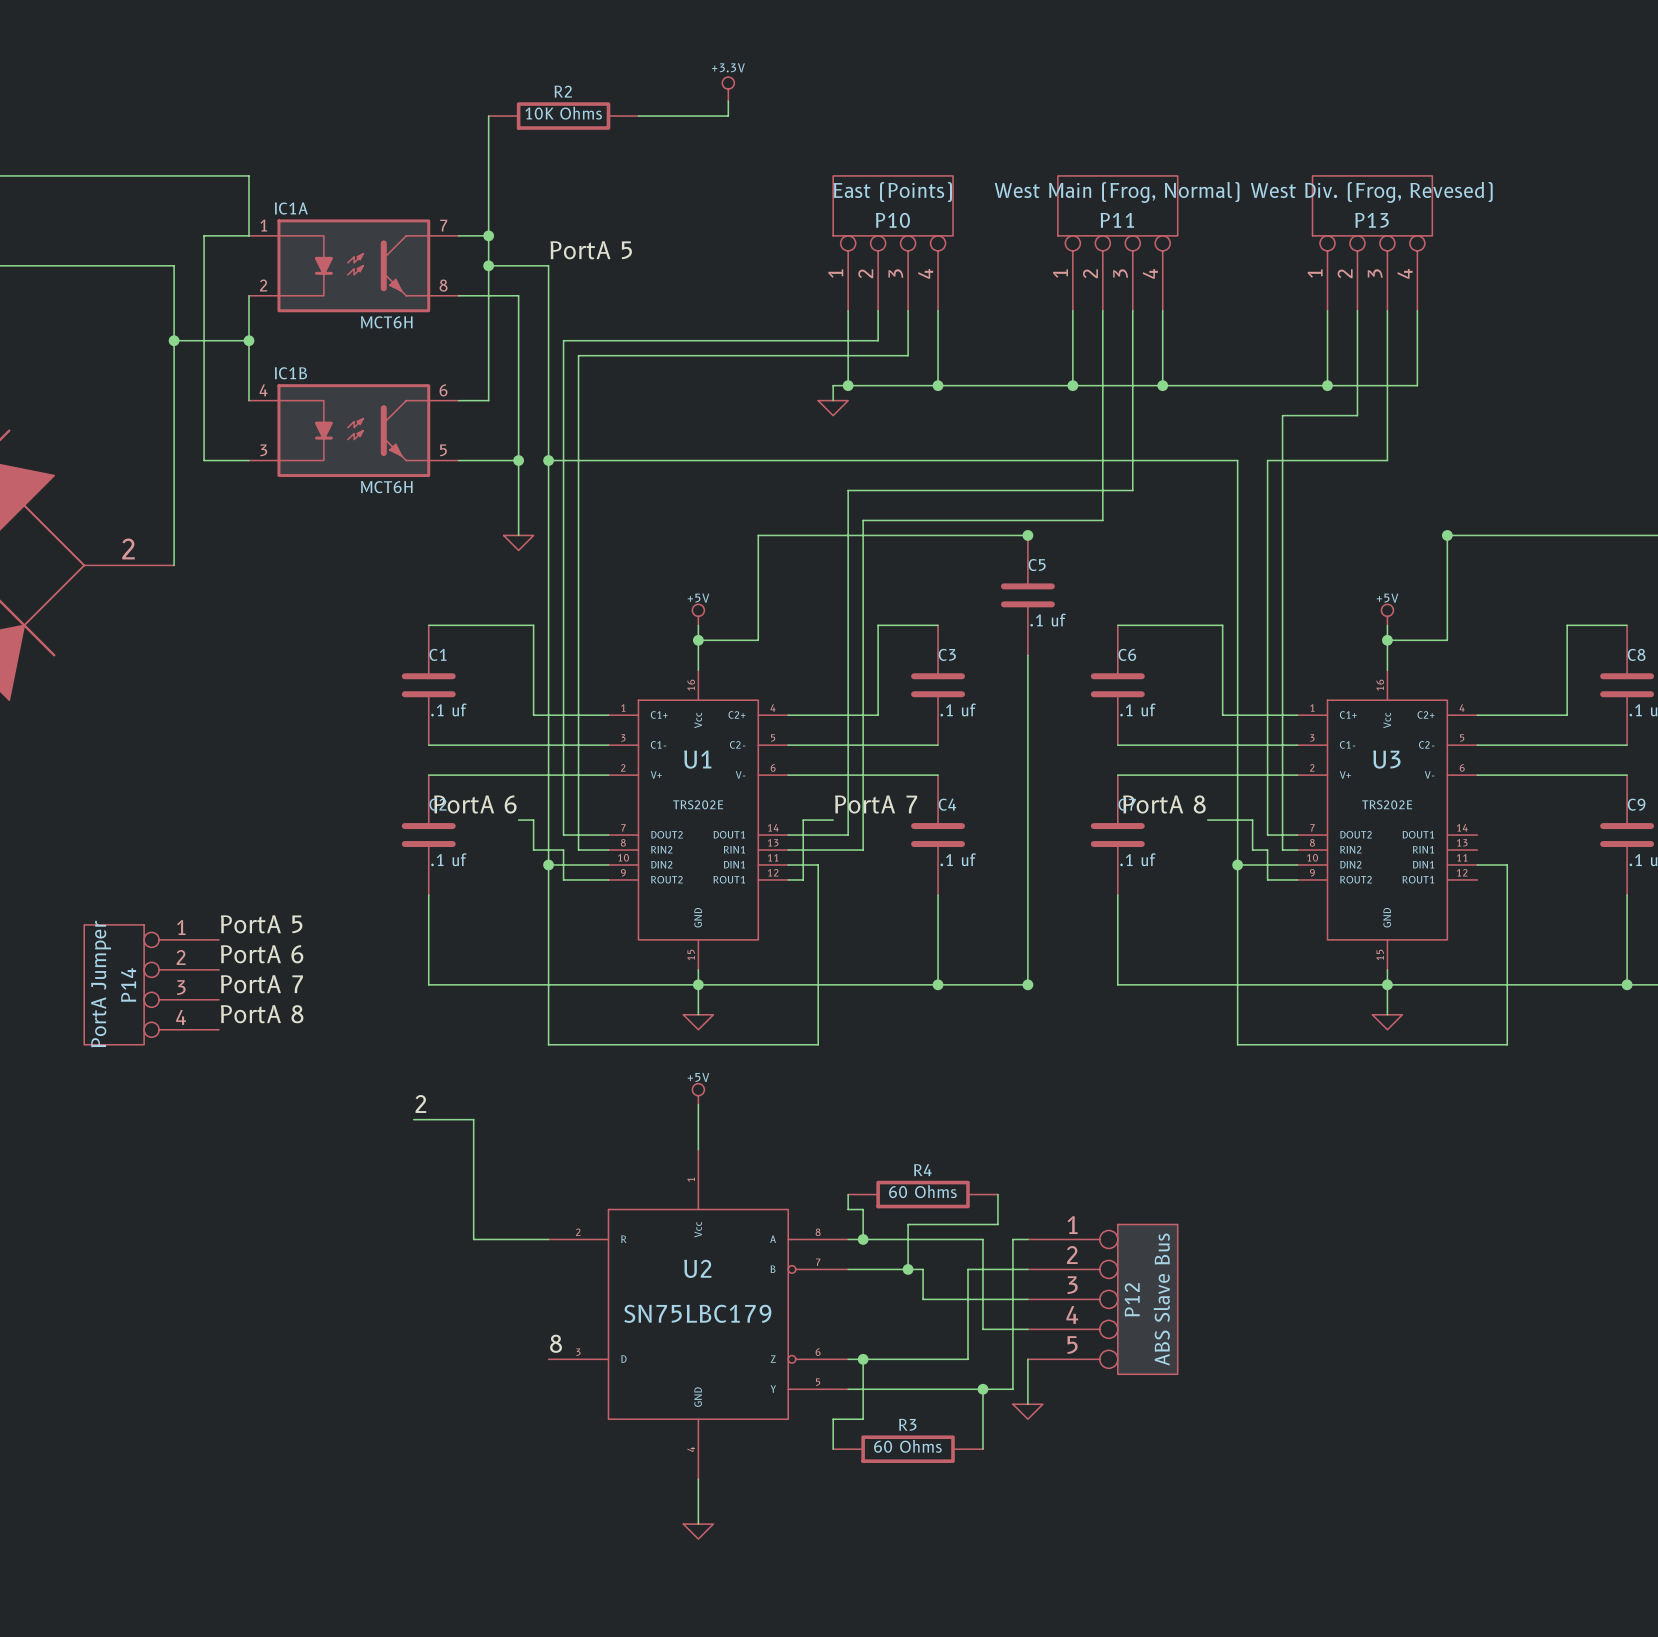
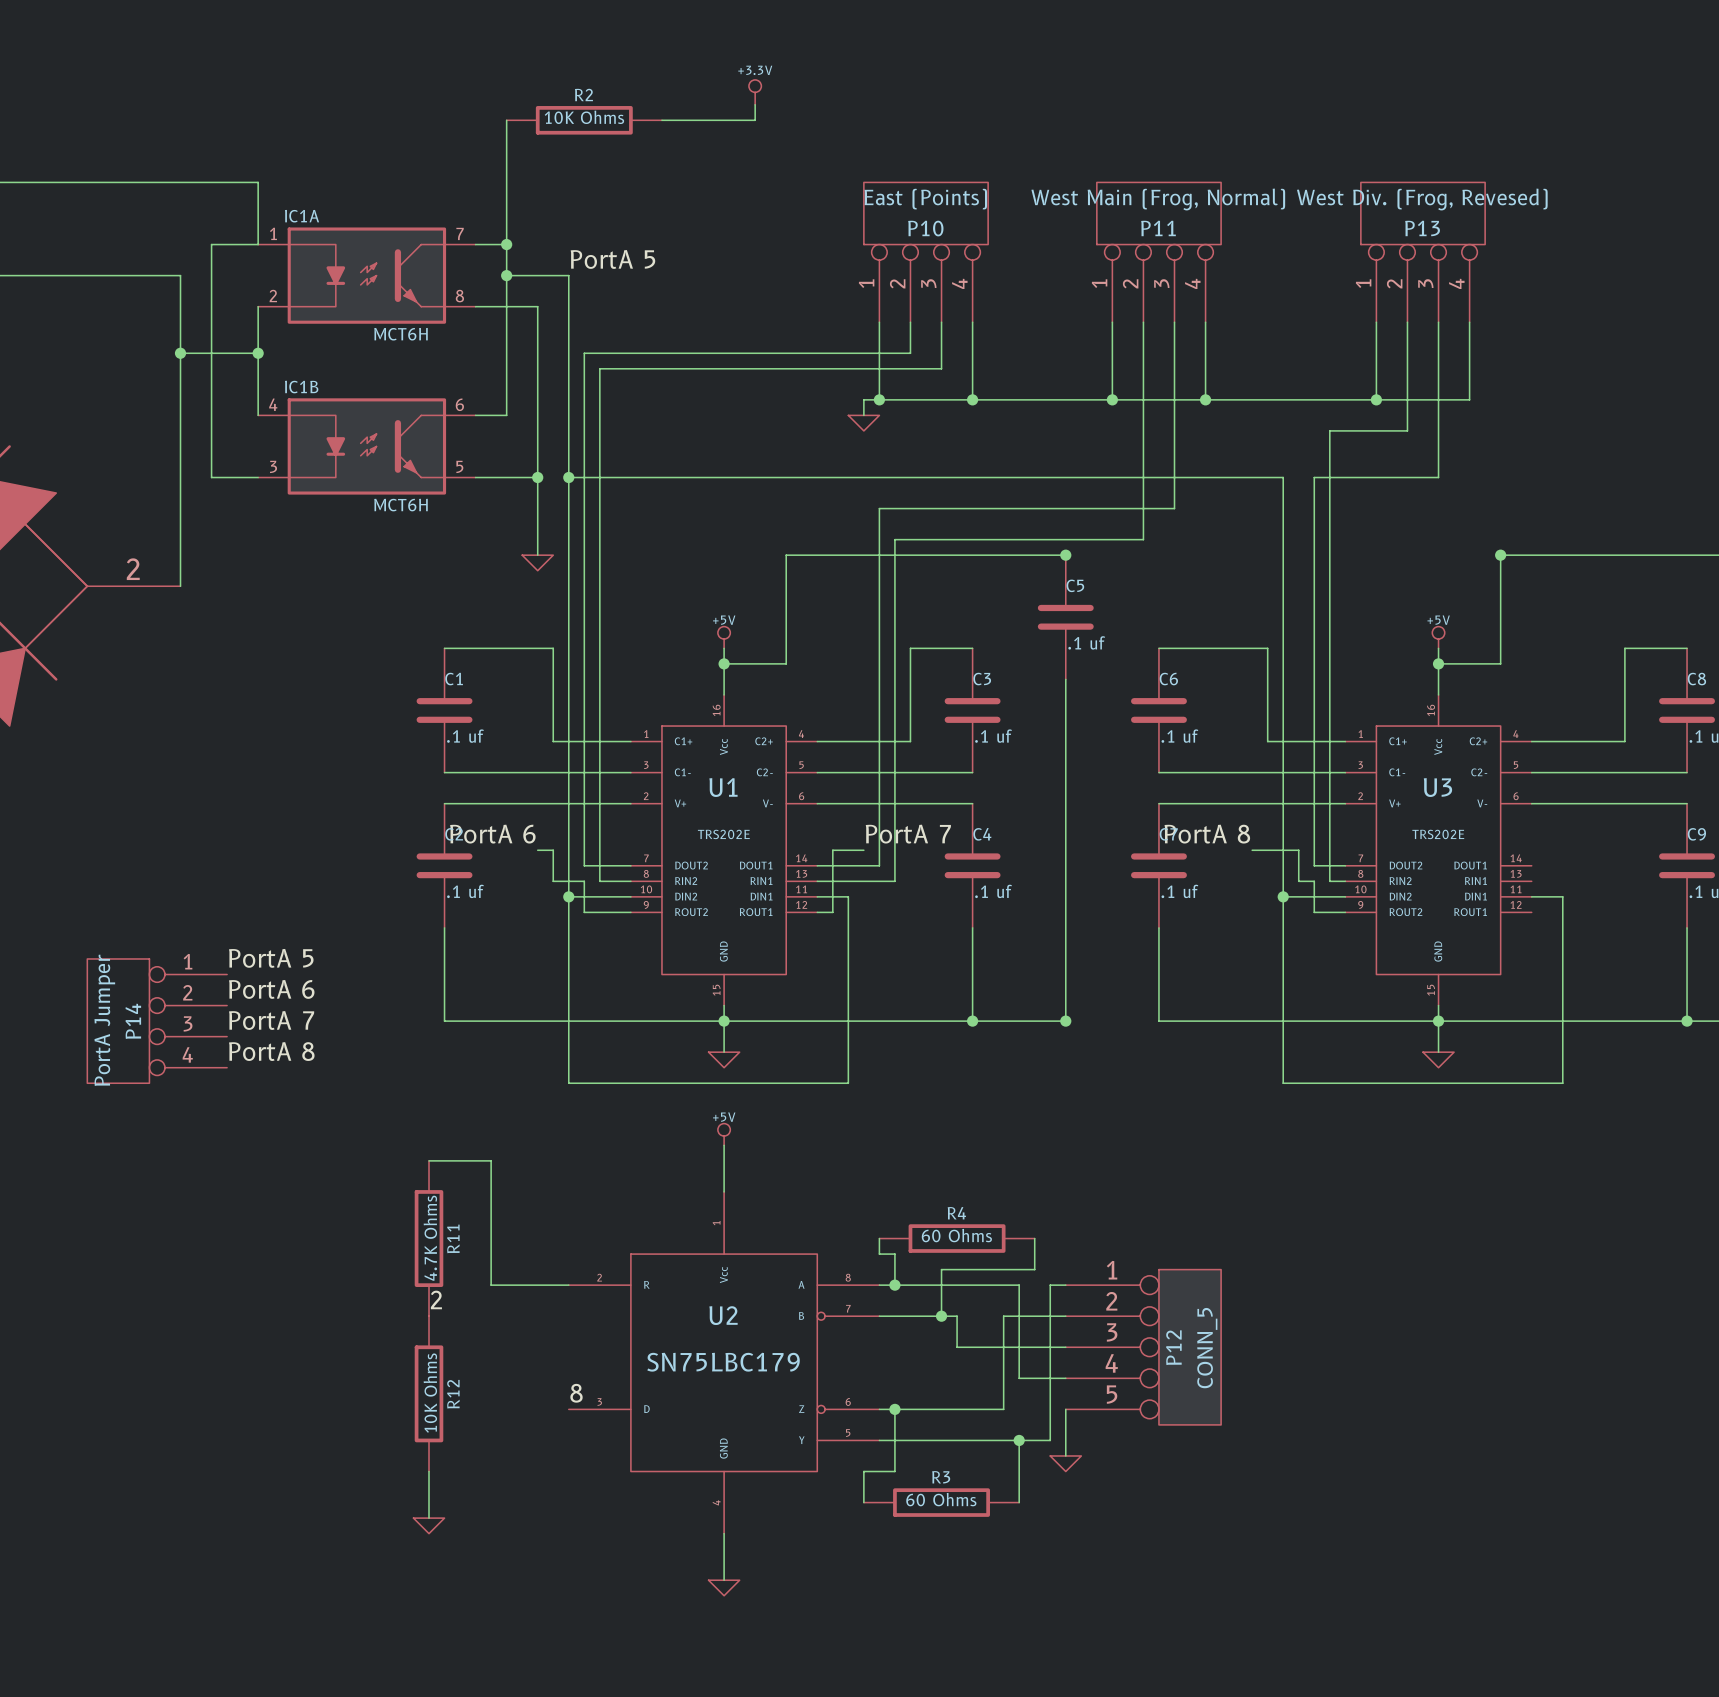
label position: 2 (420, 1103) -> 2 (436, 1299)
R11: none -> 4.7K Ohms (429, 1238)
P12 value: ABS Slave Bus (1161, 1299) -> CONN_5 (1207, 1348)
R12: none -> 10K Ohms (429, 1393)
wire: none -> (429, 1471) (429, 1518)
power symbol: none -> (429, 1525)

